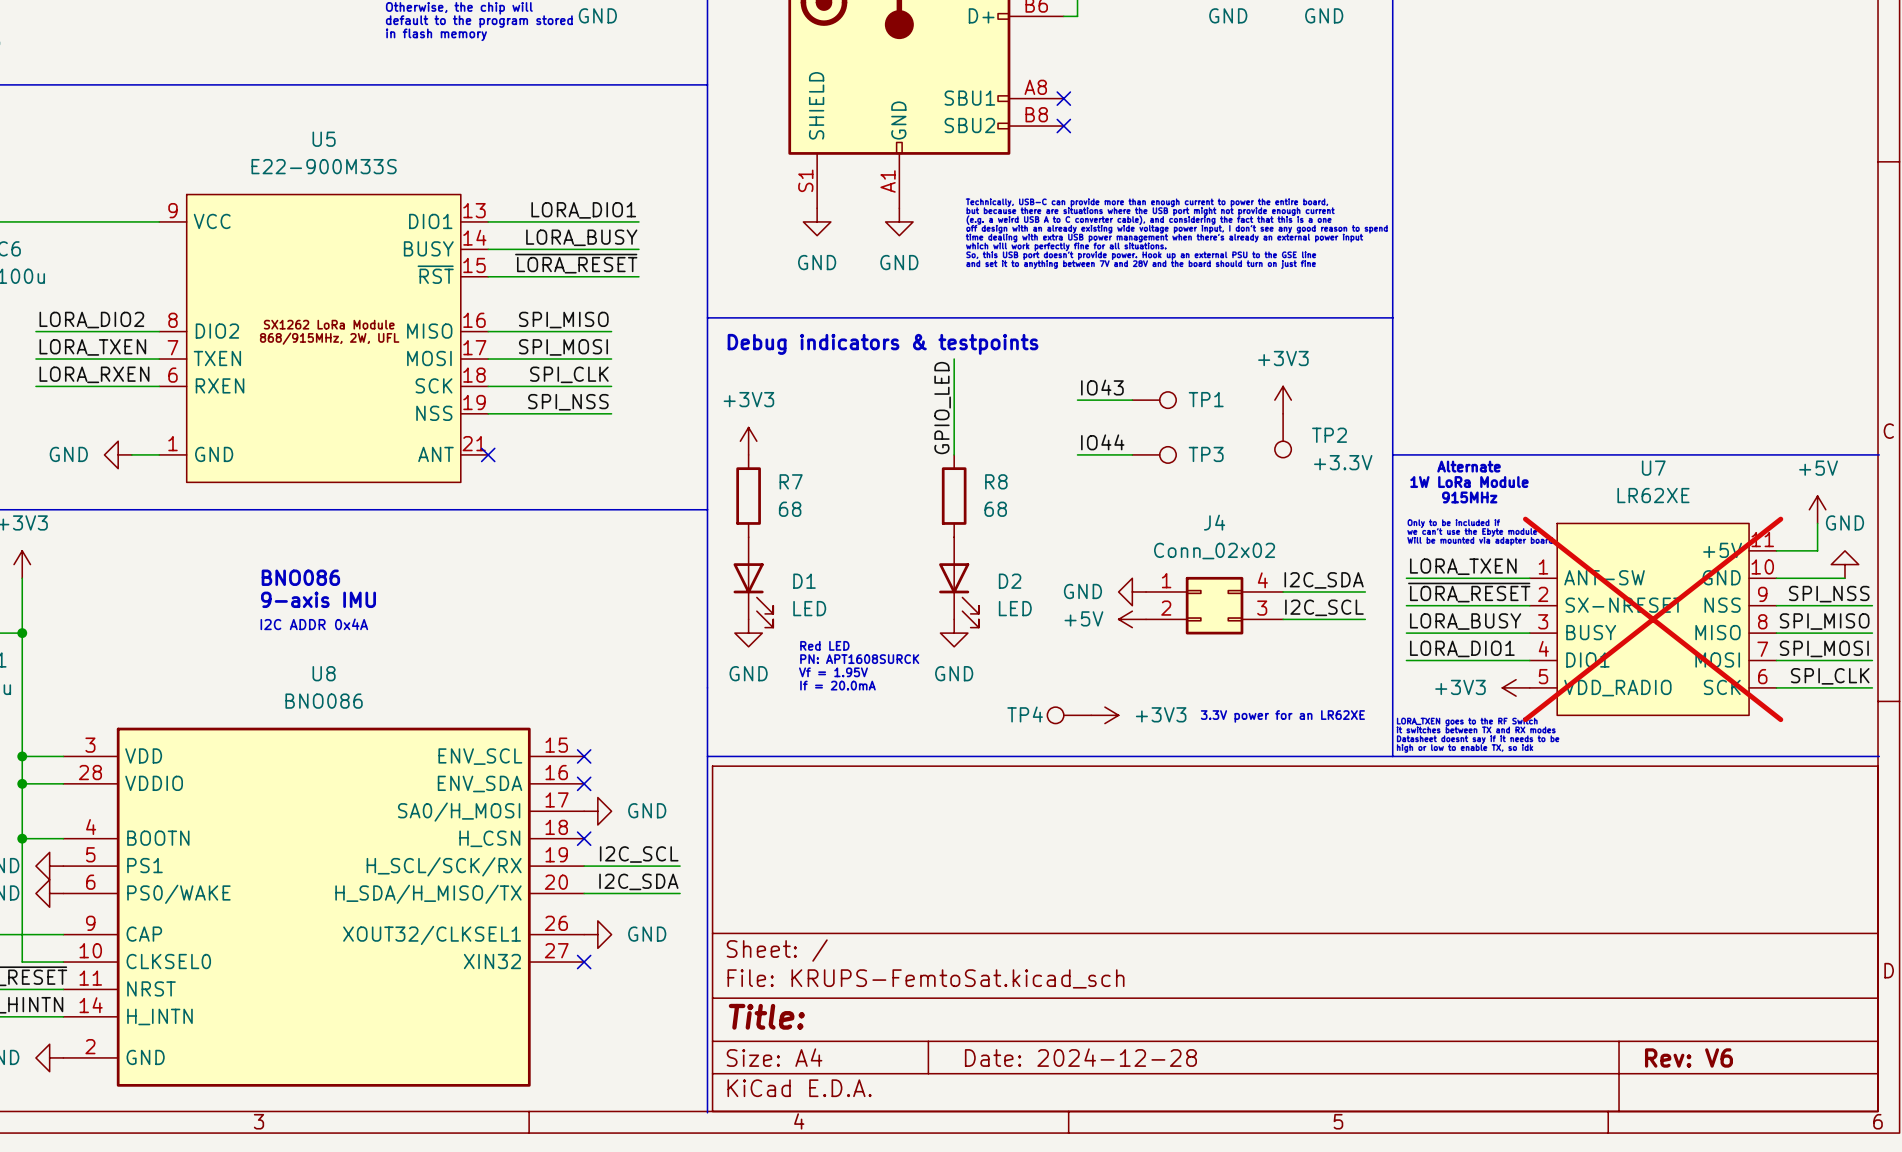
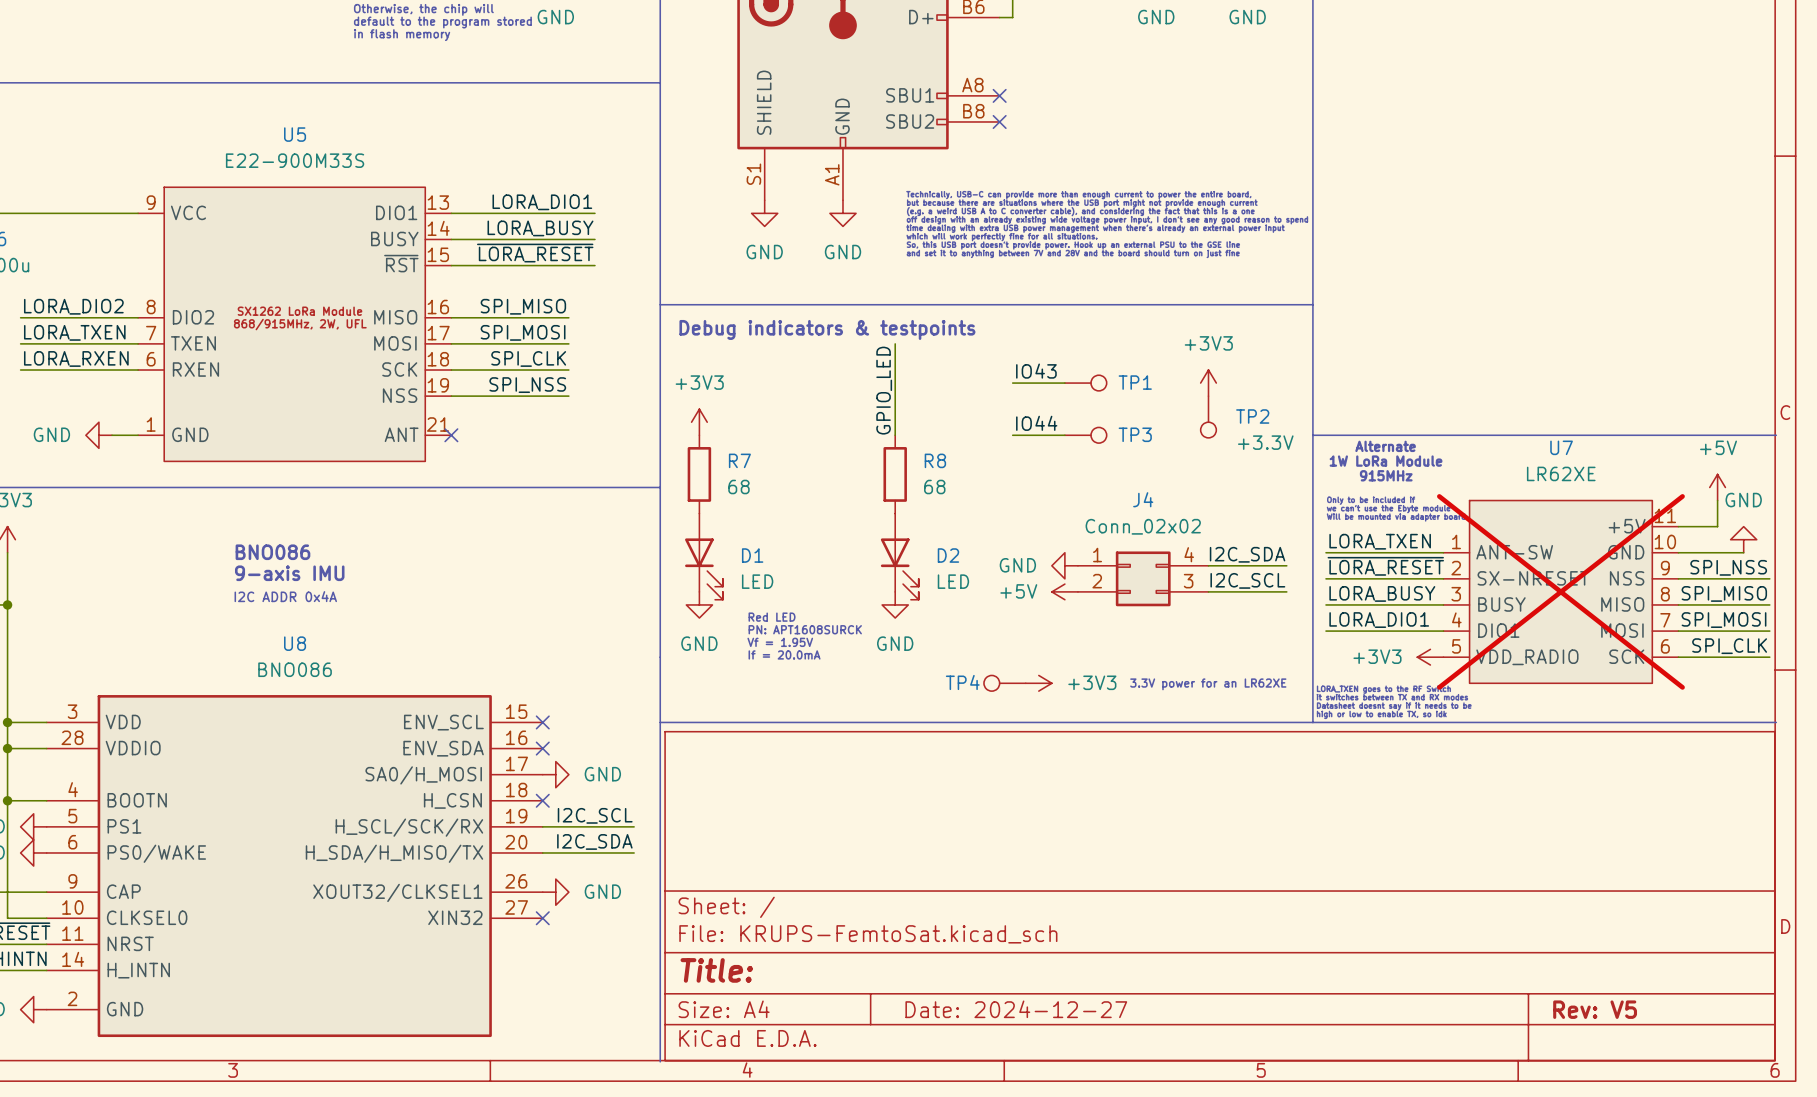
title block: Date: 2024-12-28 (1080, 1057) -> Date: 2024-12-27 (1016, 1009)
title block: Rev: V6 (1688, 1057) -> Rev: V5 (1595, 1009)

